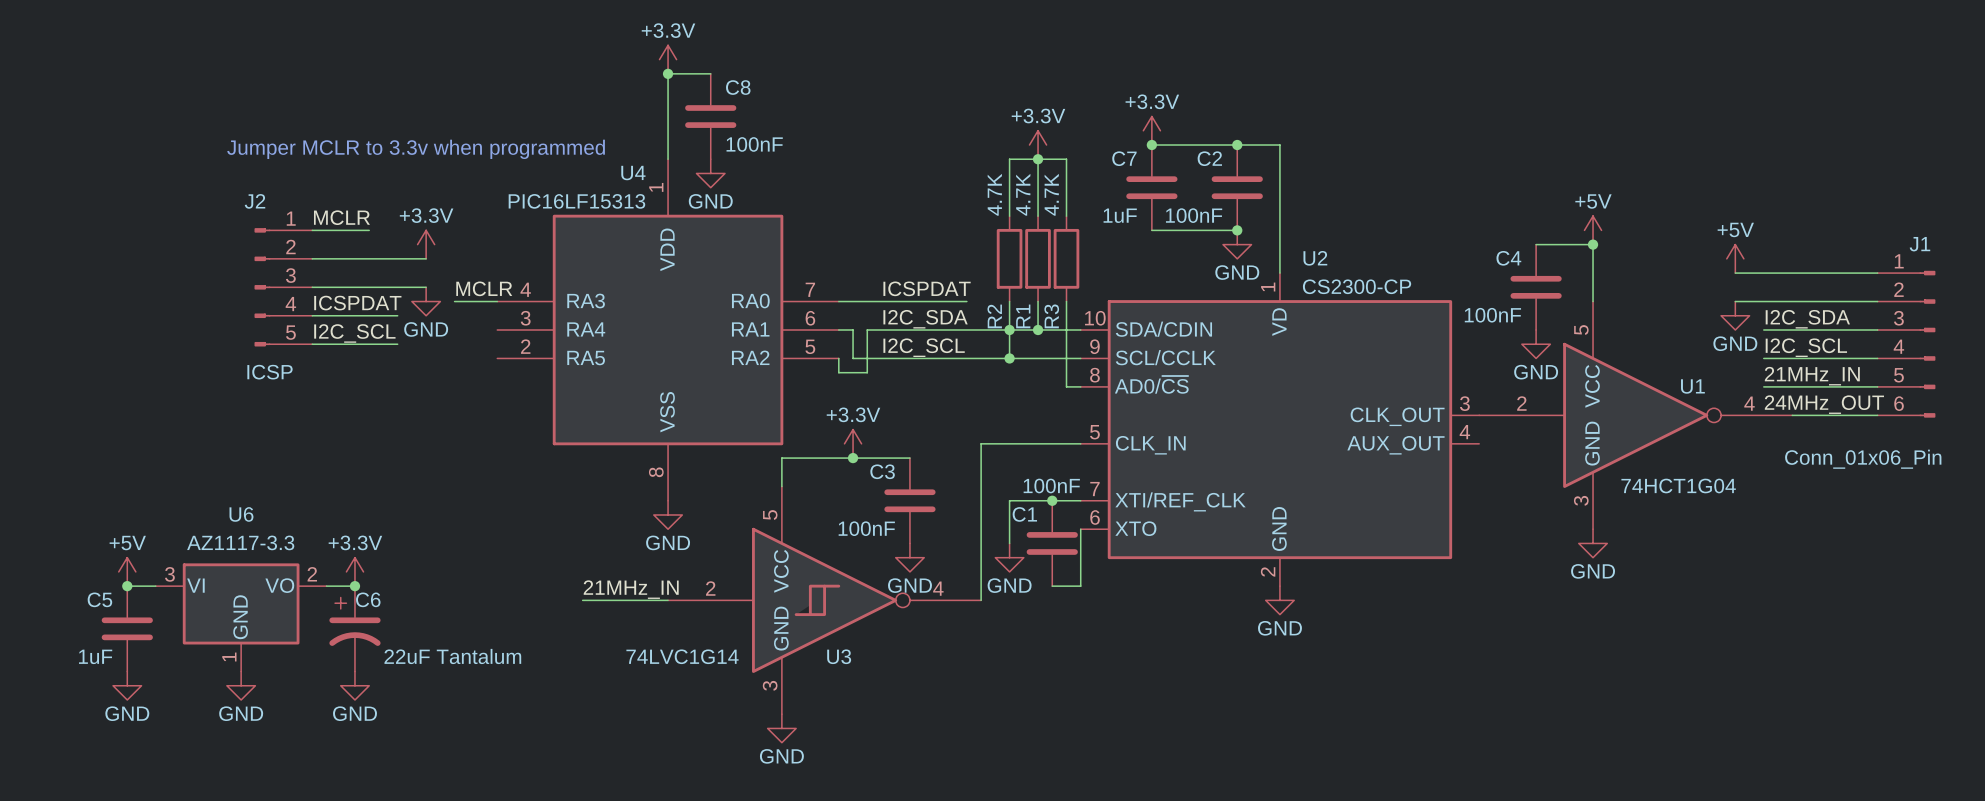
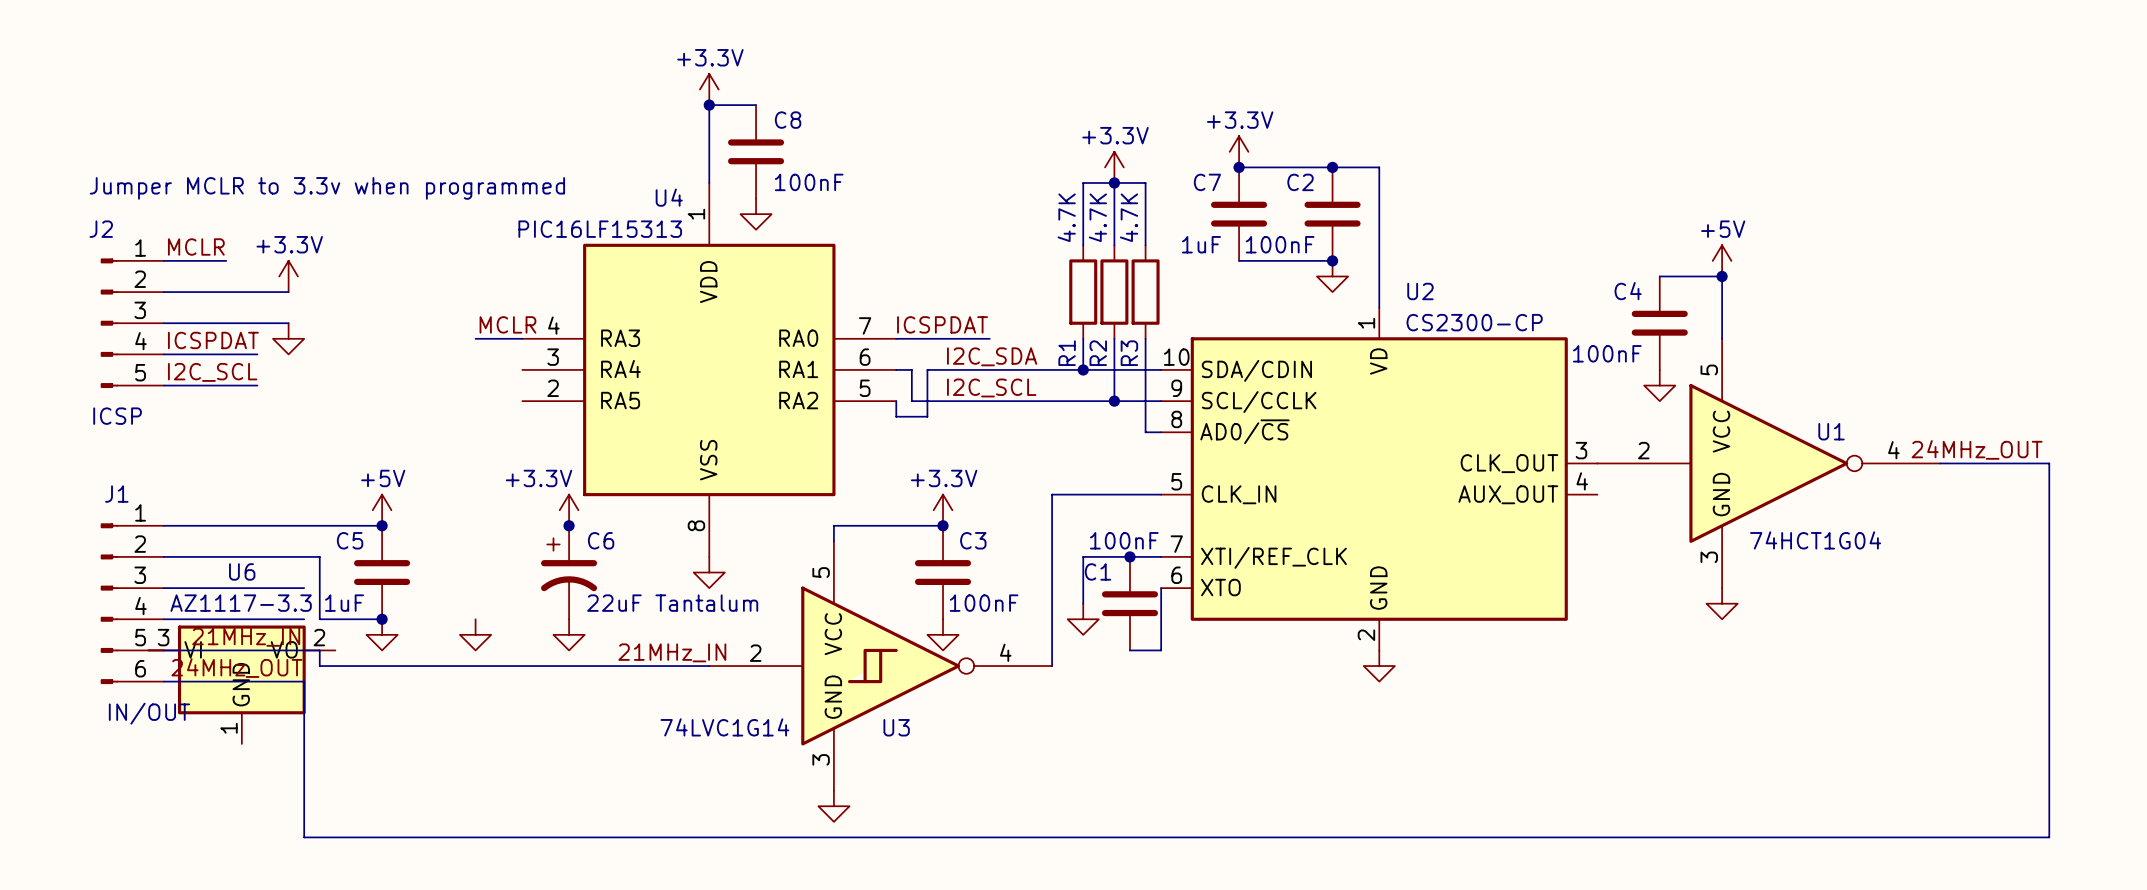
power symbol position: +3.3V (668, 59) -> +3.3V (709, 89)
junction position: (668, 73) -> (709, 105)
wire: (710, 73) (668, 73) (668, 88) -> (756, 105) (709, 105)
C8 position: (710, 116) -> (756, 151)
text: Jumper MCLR to 3.3v when programmed (416, 149) -> none
text: none -> Jumper MCLR to 3.3v when programmed (327, 188)
power symbol: GND (710, 173) -> none
power symbol: none -> (756, 214)
label position: MCLR (341, 217) -> MCLR (196, 247)
wire: (312, 230) (369, 230) -> (163, 260) (226, 260)
power symbol: none -> +3.3V (288, 276)
power symbol: +3.3V (426, 244) -> none
wire: (312, 258) (426, 258) -> (163, 292) (288, 292)
power symbol: +5V (1735, 258) -> none
power symbol text: GND (1237, 272) -> none
wire: (1735, 273) (1877, 273) -> none
J2 position: (283, 287) -> (132, 323)
wire: (312, 287) (426, 287) -> (163, 323) (288, 323)
label position: ICSPDAT (927, 288) -> ICSPDAT (942, 324)
power symbol: none -> (288, 338)
power symbol: GND (426, 301) -> none
wire: (924, 301) (966, 301) -> none
wire: (1735, 301) (1877, 301) -> none
label position: ICSPDAT (357, 303) -> ICSPDAT (213, 340)
wire: (312, 315) (397, 315) -> (163, 354) (257, 354)
power symbol: GND (1735, 315) -> none
R2 name: R2 (994, 316) -> R1 (1067, 353)
R1 name: R1 (1023, 316) -> R2 (1098, 353)
label: I2C_SDA (1807, 319) -> none
wire: (1009, 330) (1009, 358) -> (1114, 369) (1114, 401)
junction: (1038, 330) -> none
wire: (1763, 330) (1877, 330) -> none
label position: I2C_SCL (354, 333) -> I2C_SCL (212, 372)
wire: (312, 344) (397, 344) -> (163, 385) (257, 385)
J1 position: (1906, 344) -> (132, 603)
J1 flip: as is (1927, 344) -> left-right (109, 603)
label: I2C_SCL (1806, 347) -> none
junction: (1009, 358) -> none
junction: none -> (1114, 401)
wire: (1763, 358) (1877, 358) -> none
power symbol text: GND (1536, 372) -> none
label: 21MHz_IN (1812, 376) -> none
wire: (1763, 386) (1877, 386) -> none
wire: none -> (2033, 463) (2049, 463) (2049, 837) (304, 837) (304, 681) (163, 681)
power symbol position: +3.3V (853, 443) -> +3.3V (943, 510)
power symbol: none -> +3.3V (569, 510)
junction position: (853, 458) -> (943, 525)
wire: (909, 458) (781, 458) (781, 472) -> (943, 525) (833, 525)
J1 value: Conn_01x06_Pin (1863, 459) -> IN/OUT (149, 713)
C3 name position: C3 (882, 471) -> C3 (973, 540)
wire: none -> (163, 525) (382, 525)
junction: none -> (382, 525)
junction: none -> (569, 525)
wire: none -> (163, 556) (319, 556) (319, 619) (382, 619)
C3 position: (909, 500) -> (943, 572)
C3 value position: 100nF (866, 528) -> 100nF (984, 603)
wire: none -> (163, 588) (304, 588)
power symbol text: GND (668, 542) -> none
wire: none -> (163, 619) (304, 619)
power symbol: GND (909, 557) -> none
power symbol position: +5V (127, 571) -> +5V (382, 510)
power symbol: +3.3V (354, 571) -> none
power symbol: none -> (382, 634)
power symbol: none -> (475, 634)
power symbol: none -> (569, 634)
power symbol: none -> (943, 634)
power symbol text: GND (1593, 571) -> none
label: none -> 21MHz_IN (246, 637)
power symbol text: GND (1009, 585) -> none
junction: (127, 586) -> none
wire: none -> (163, 650) (319, 650) (319, 666) (615, 666)
wire: (326, 586) (354, 586) -> none
junction position: (354, 586) -> (382, 619)
C6 name position: C6 (368, 599) -> C6 (601, 540)
label: none -> 24MHz_OUT (236, 668)
C5 position: (127, 628) -> (382, 572)
C6 position: (354, 628) -> (569, 572)
power symbol text: GND (1279, 628) -> none
C6 value position: 22uF Tantalum (452, 656) -> 22uF Tantalum (672, 603)
power symbol: GND (127, 685) -> none
power symbol: GND (241, 685) -> none
power symbol: GND (354, 685) -> none
power symbol text: GND (781, 756) -> none

